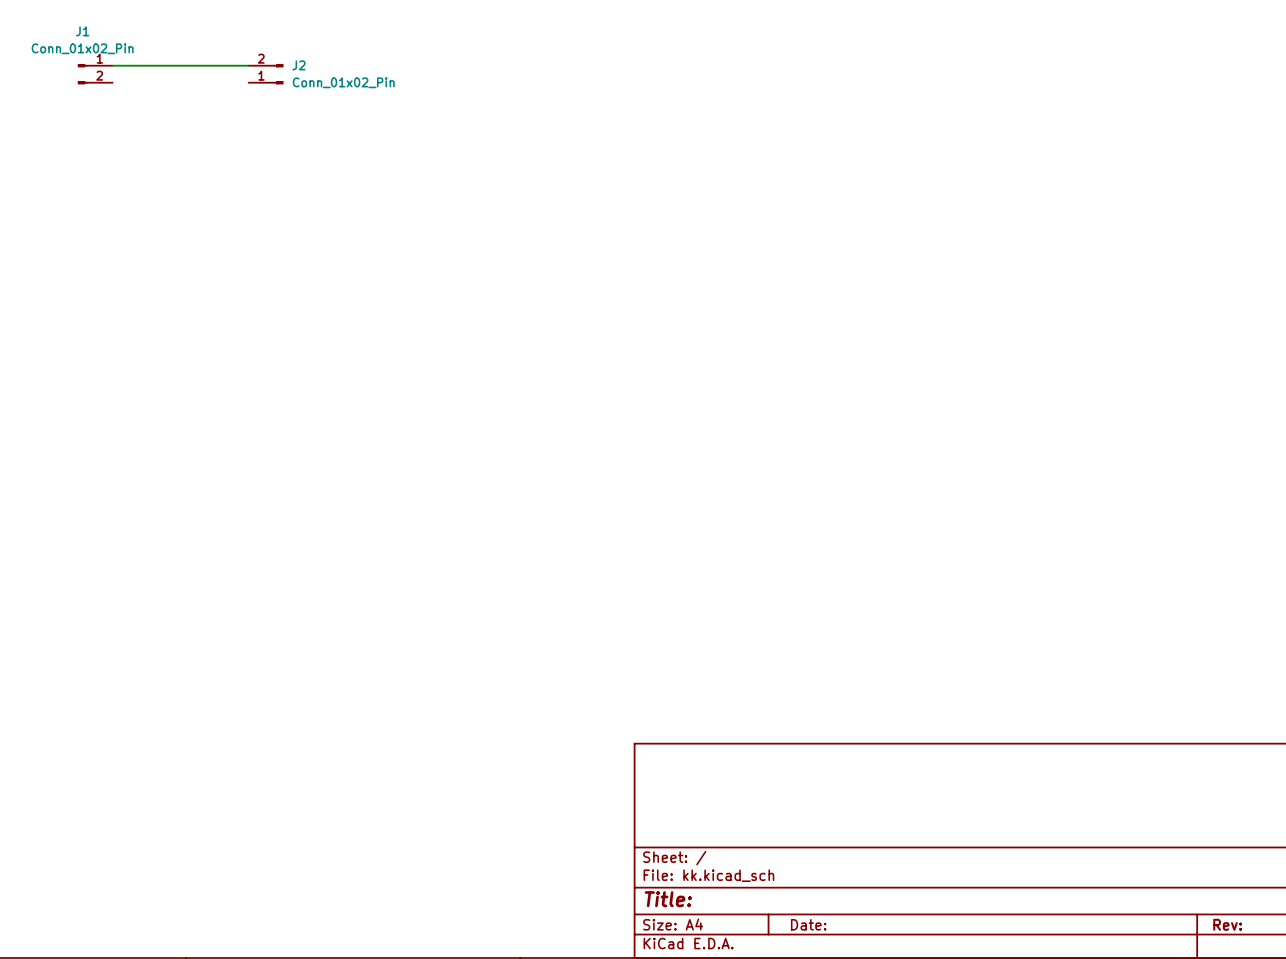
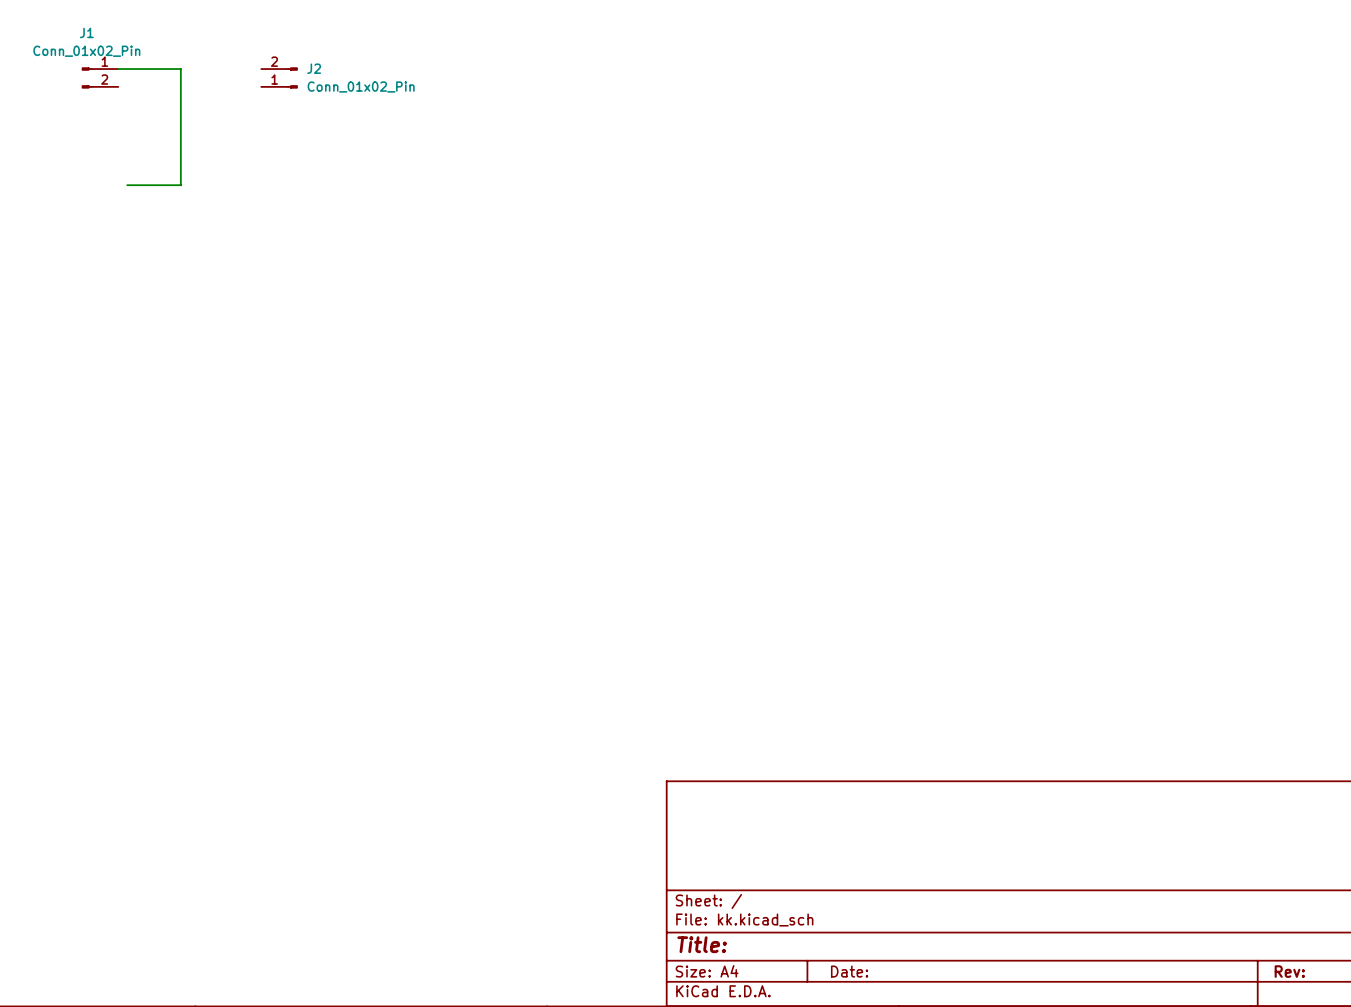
wire: (172, 65) (248, 65) -> (180, 69) (180, 185) (127, 185)

